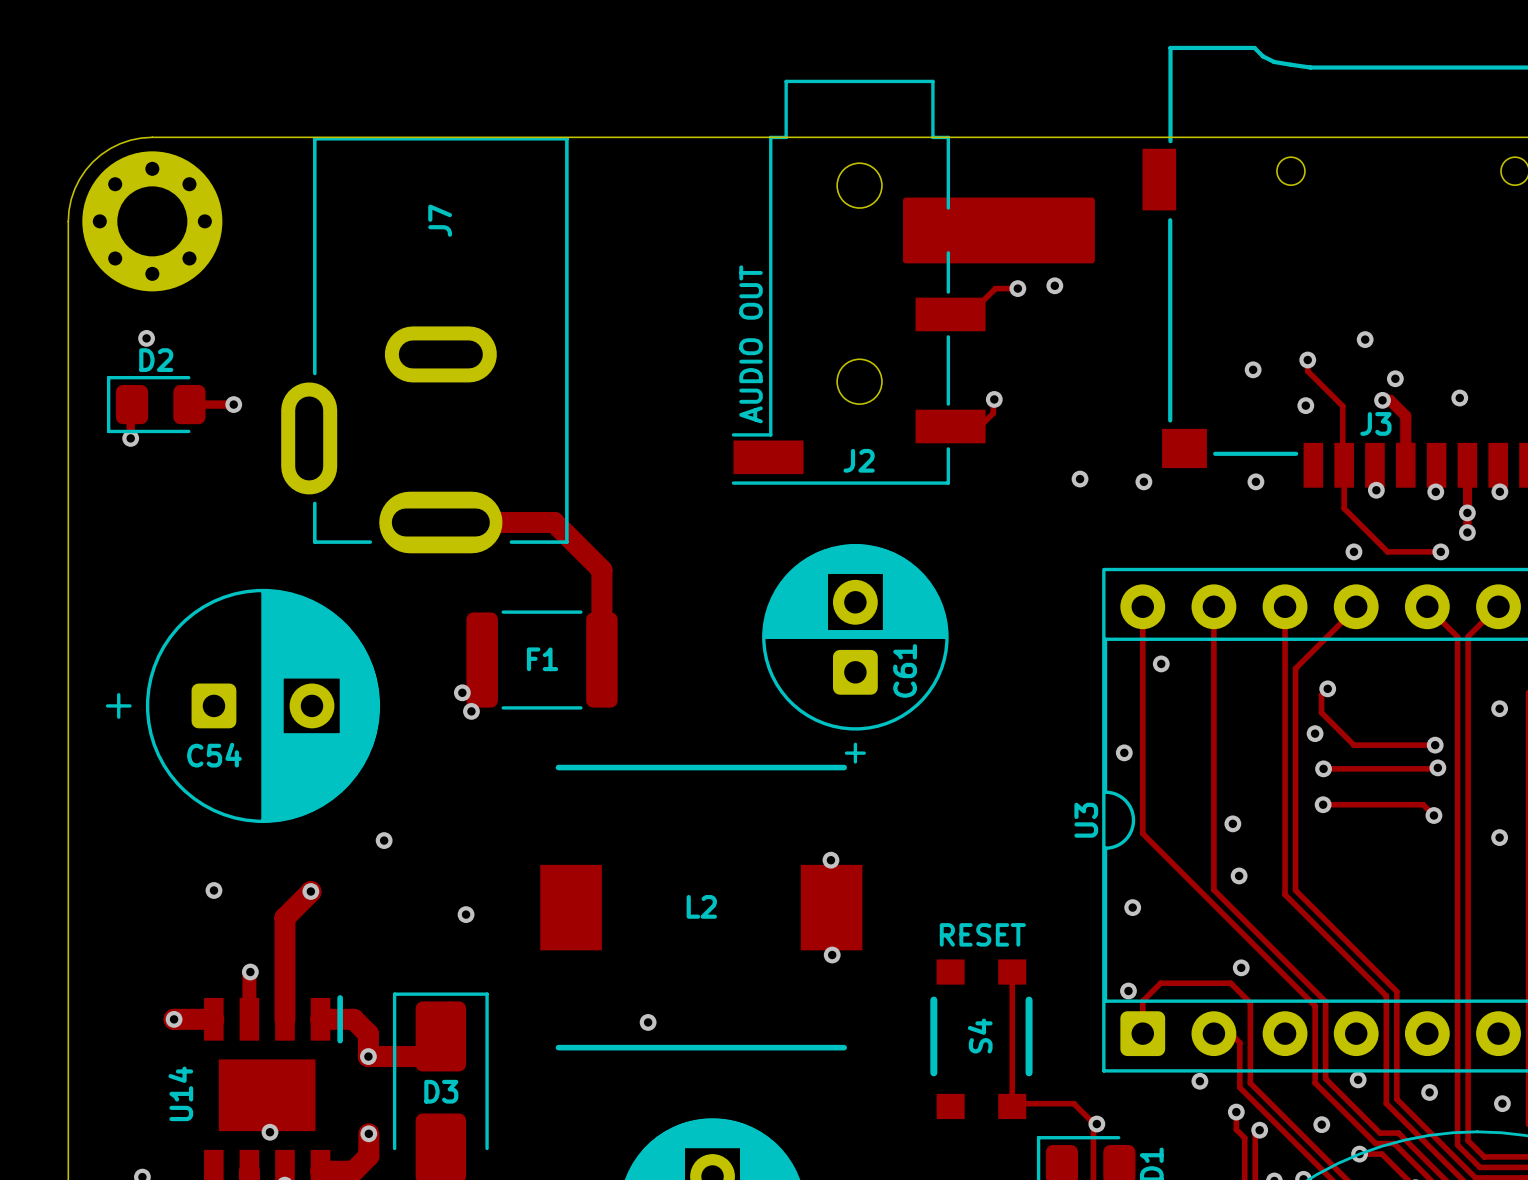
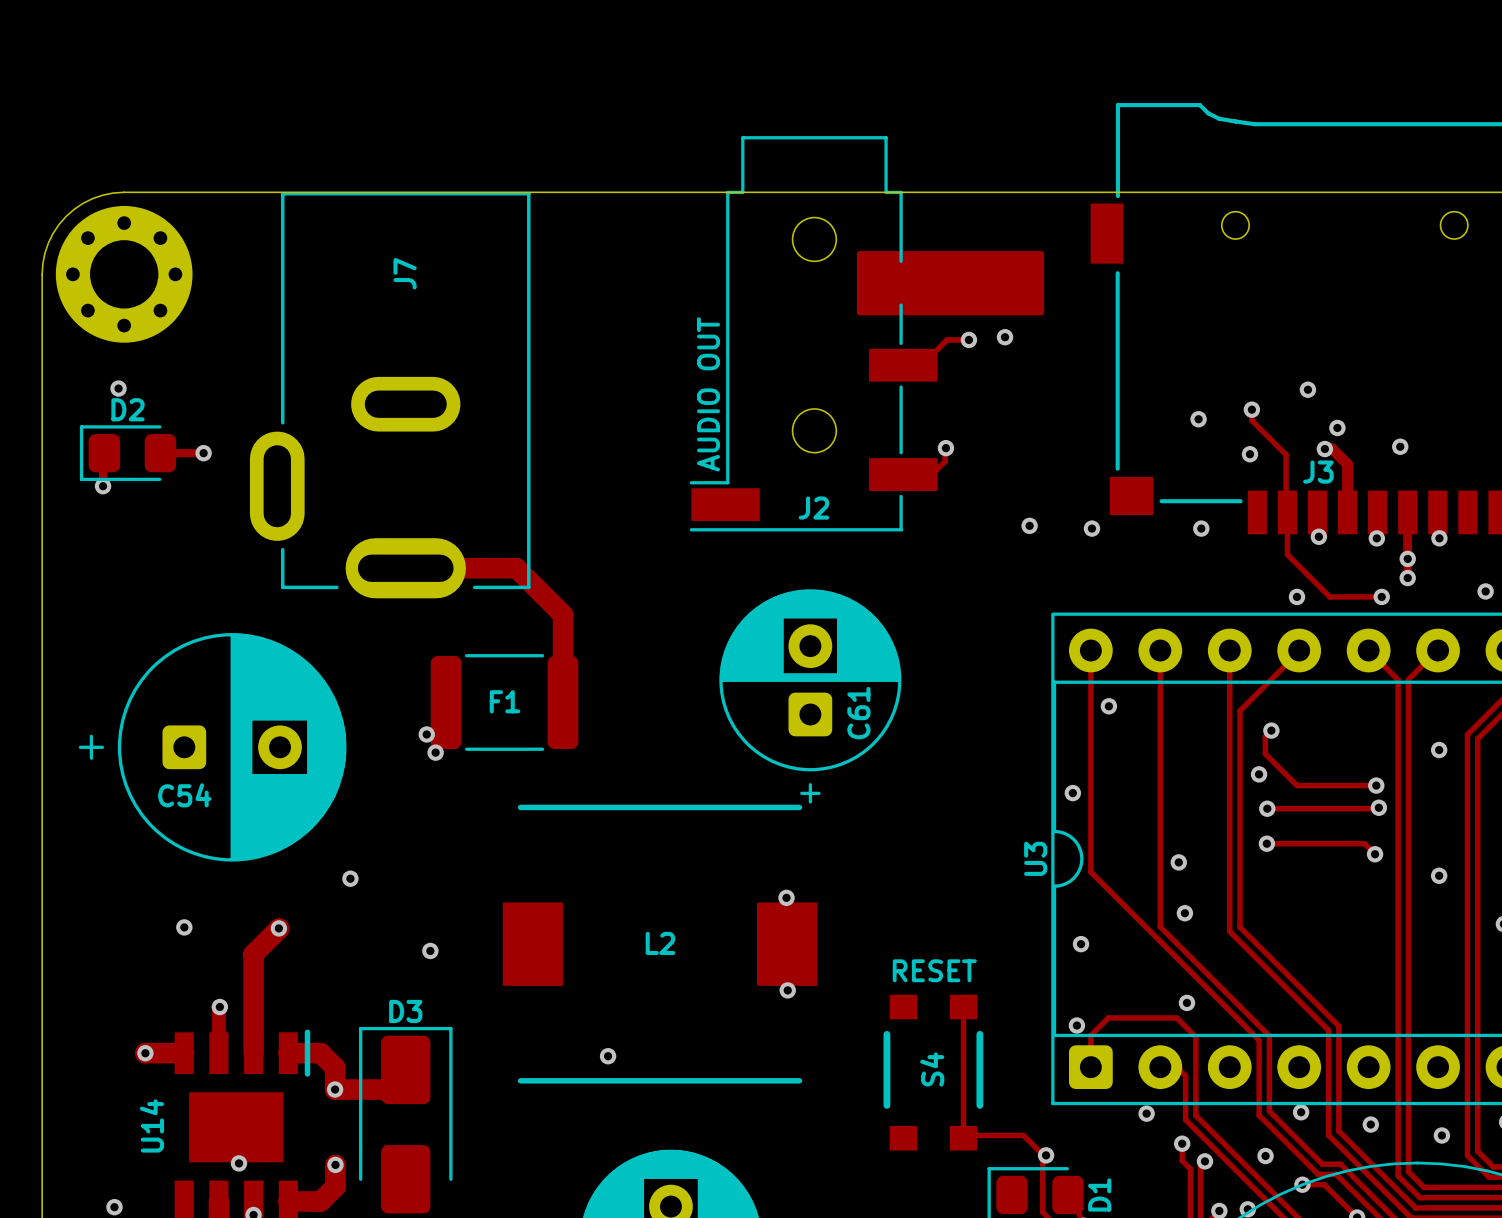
D3 name position: D3 (441, 1091) -> D3 (405, 1011)

